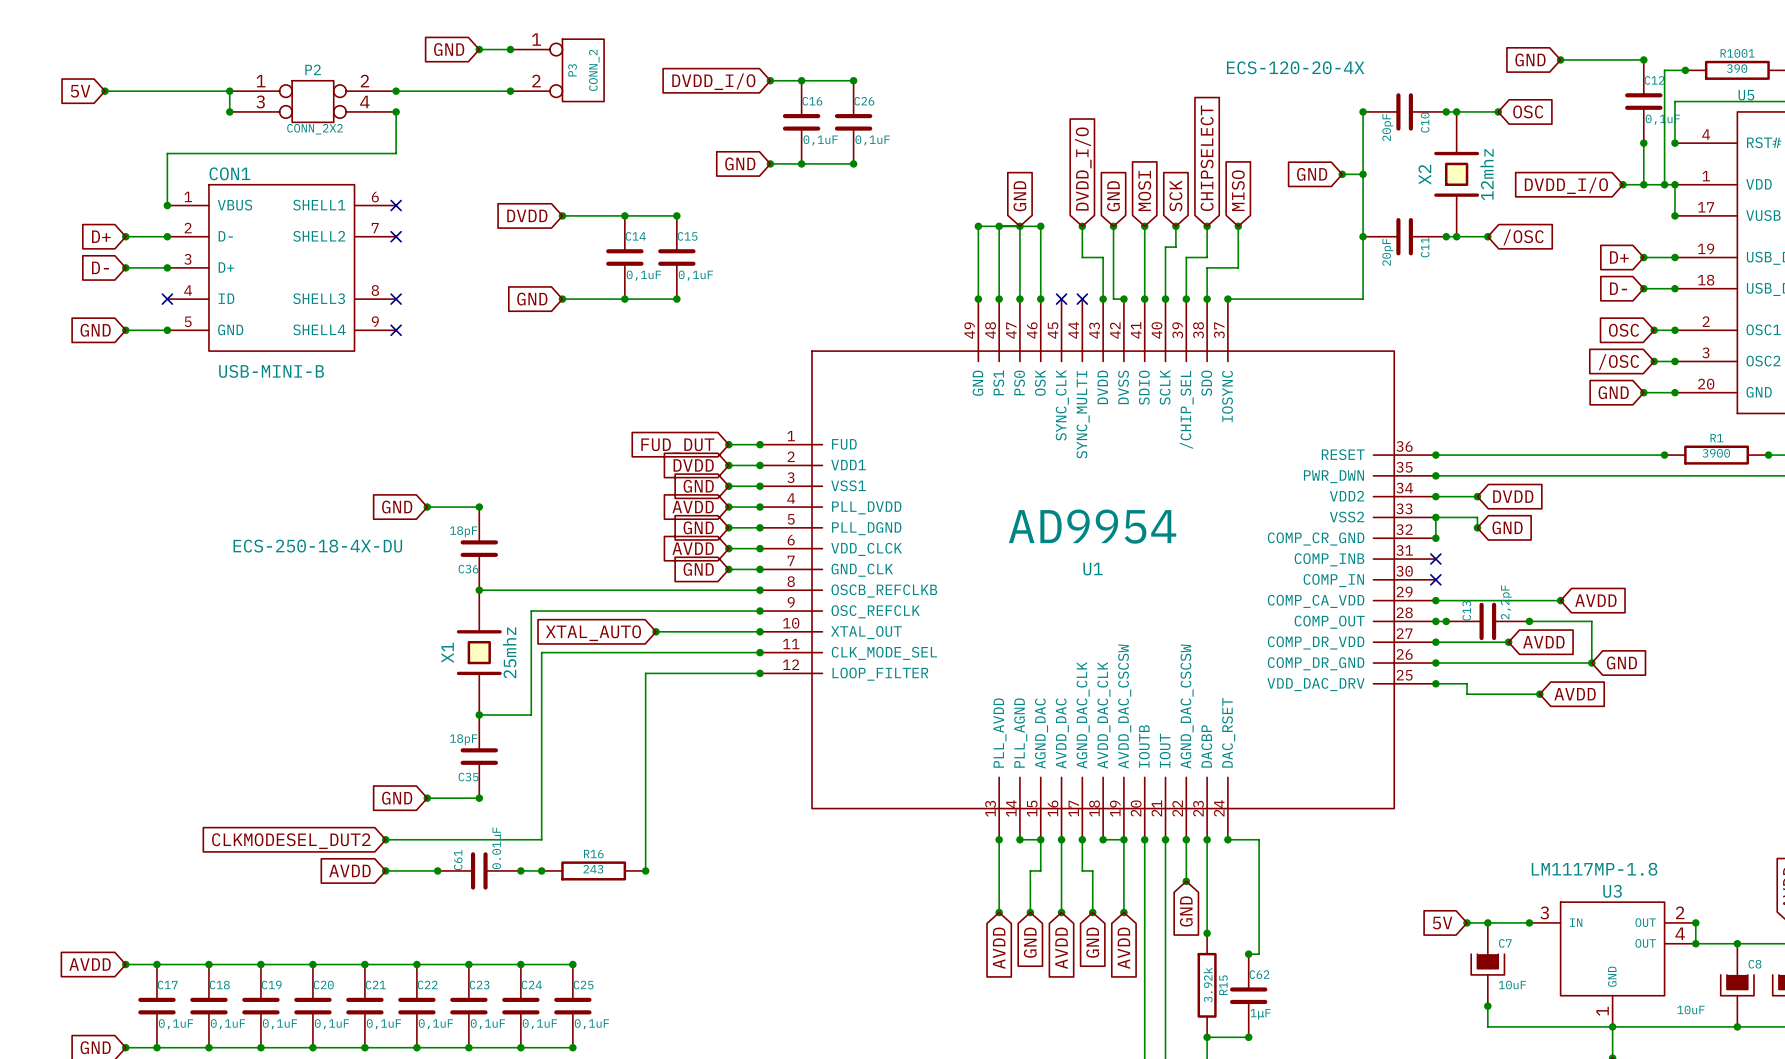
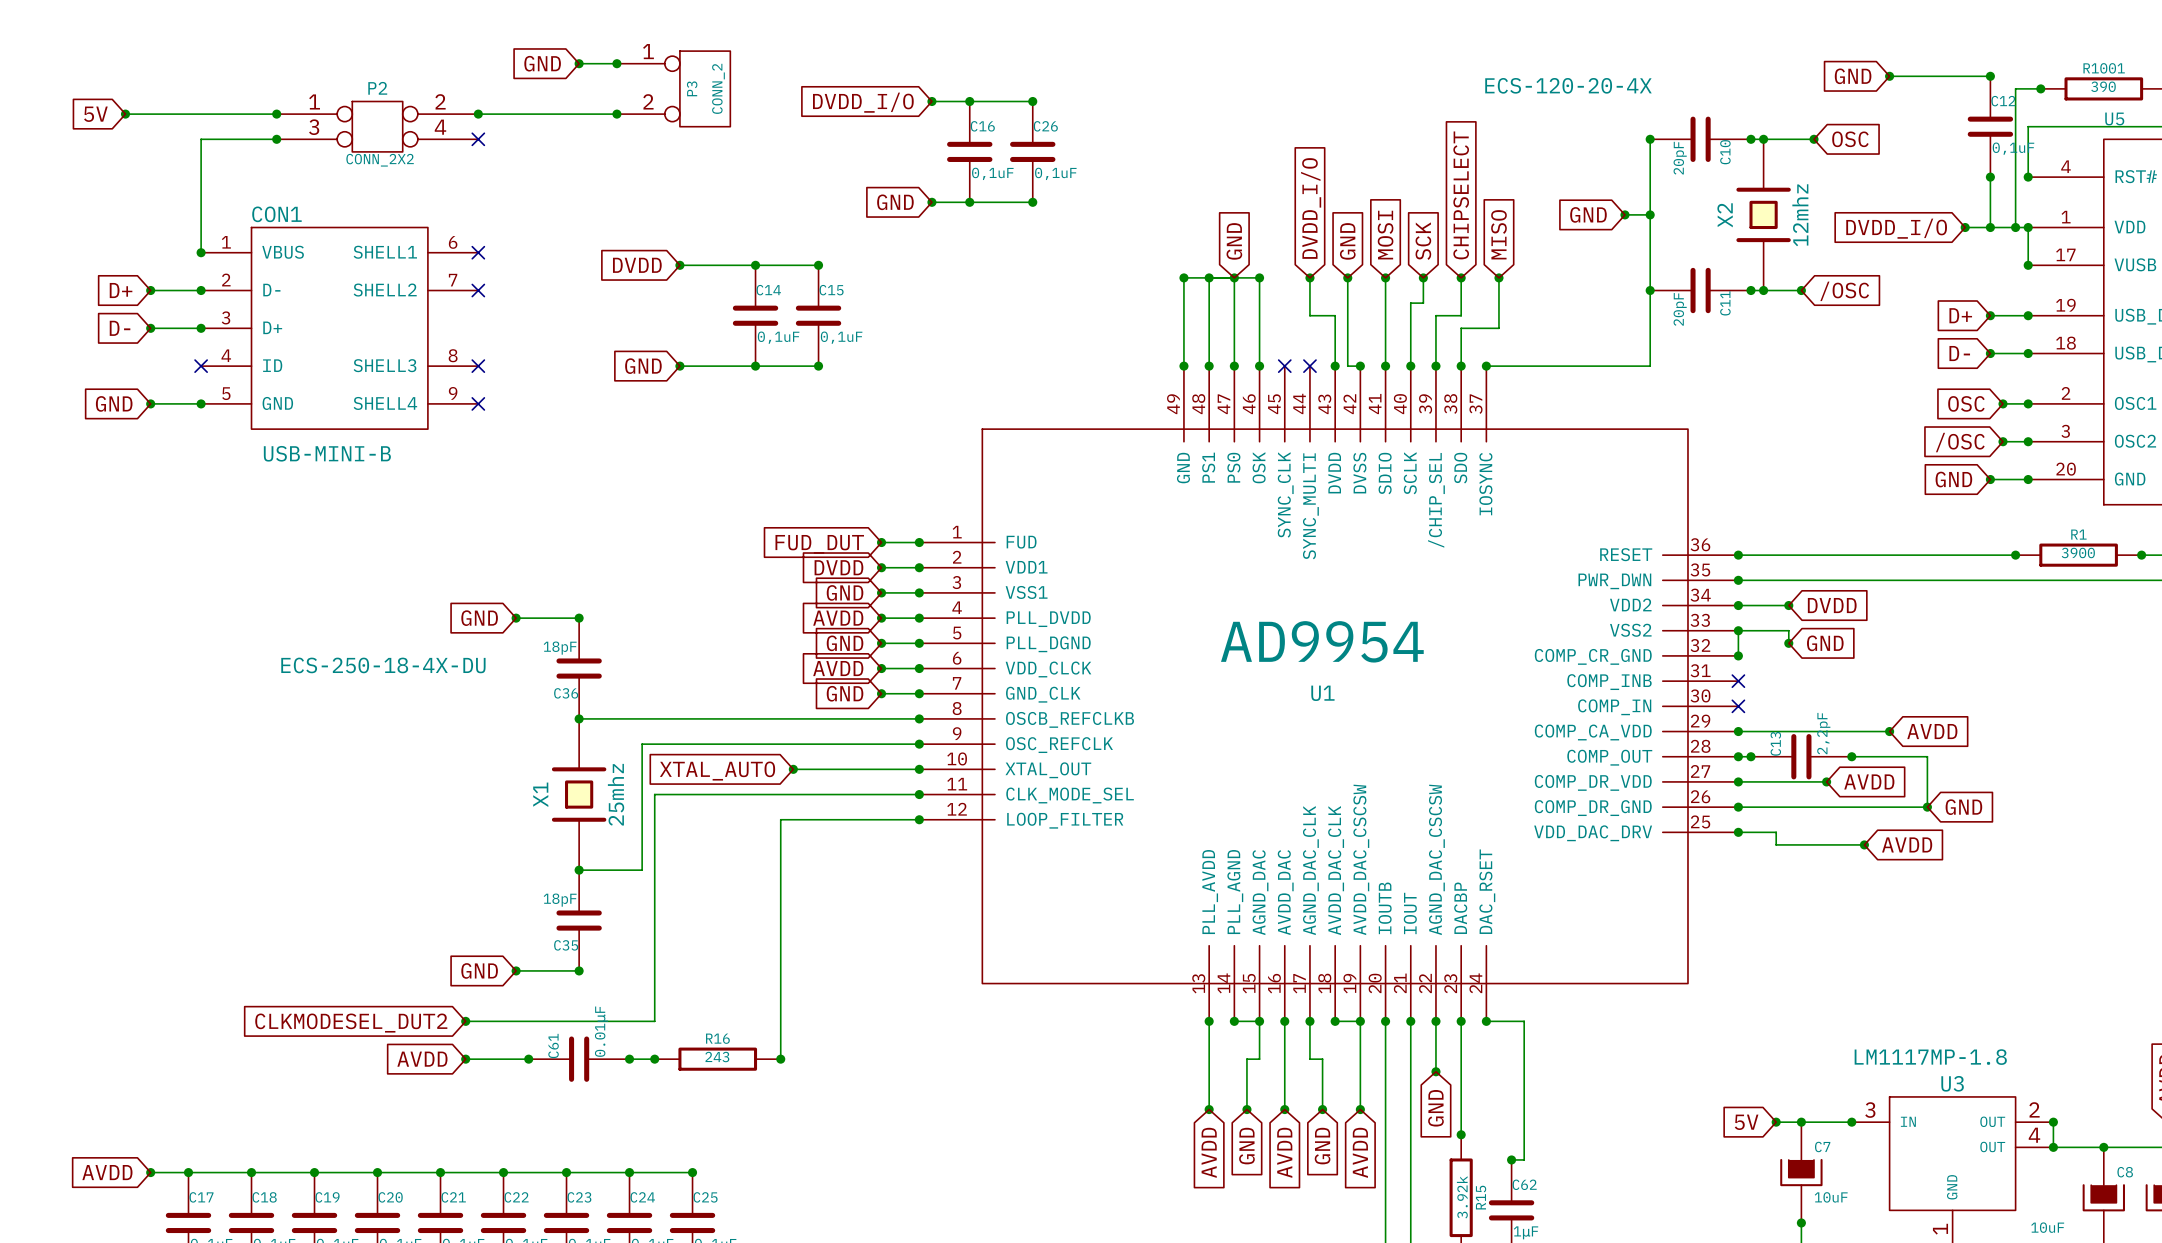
wire: (229, 91) (229, 111) -> (201, 189) (201, 139) (276, 139)
wire: (396, 111) (396, 153) (167, 153) -> none
junction: (396, 111) -> none
no-connect mark: none -> (478, 139)

